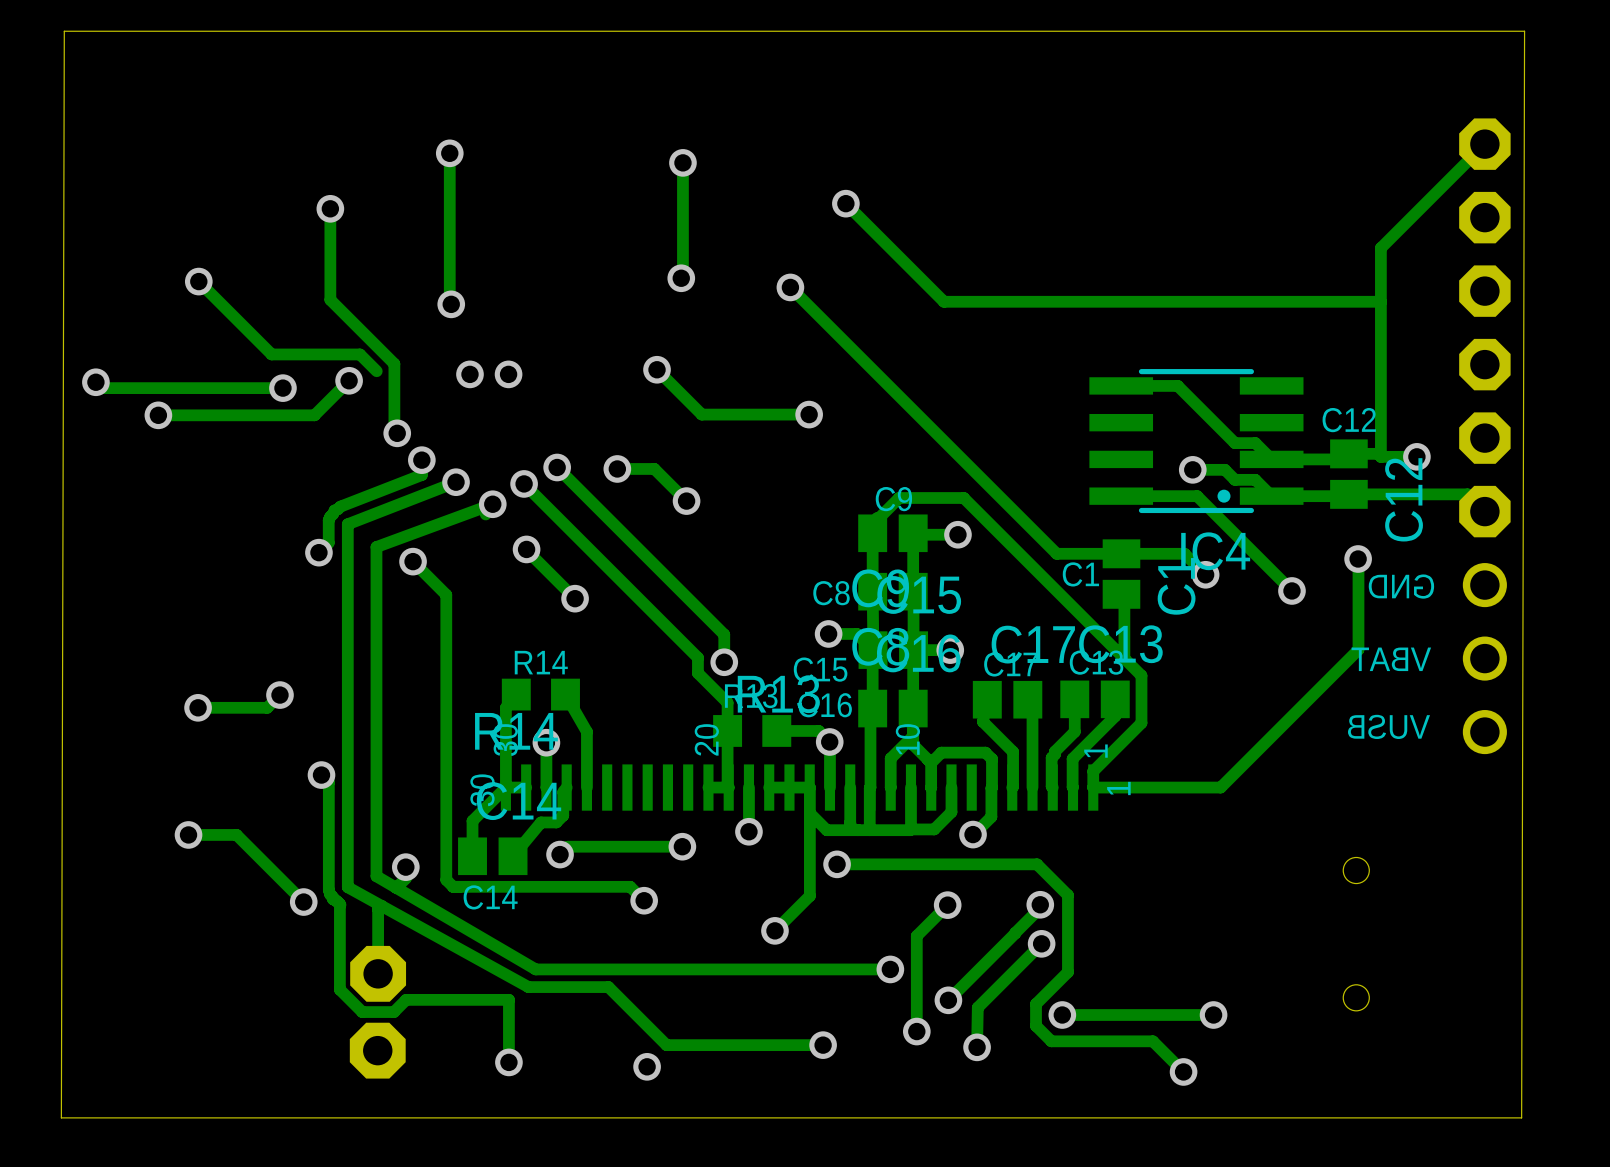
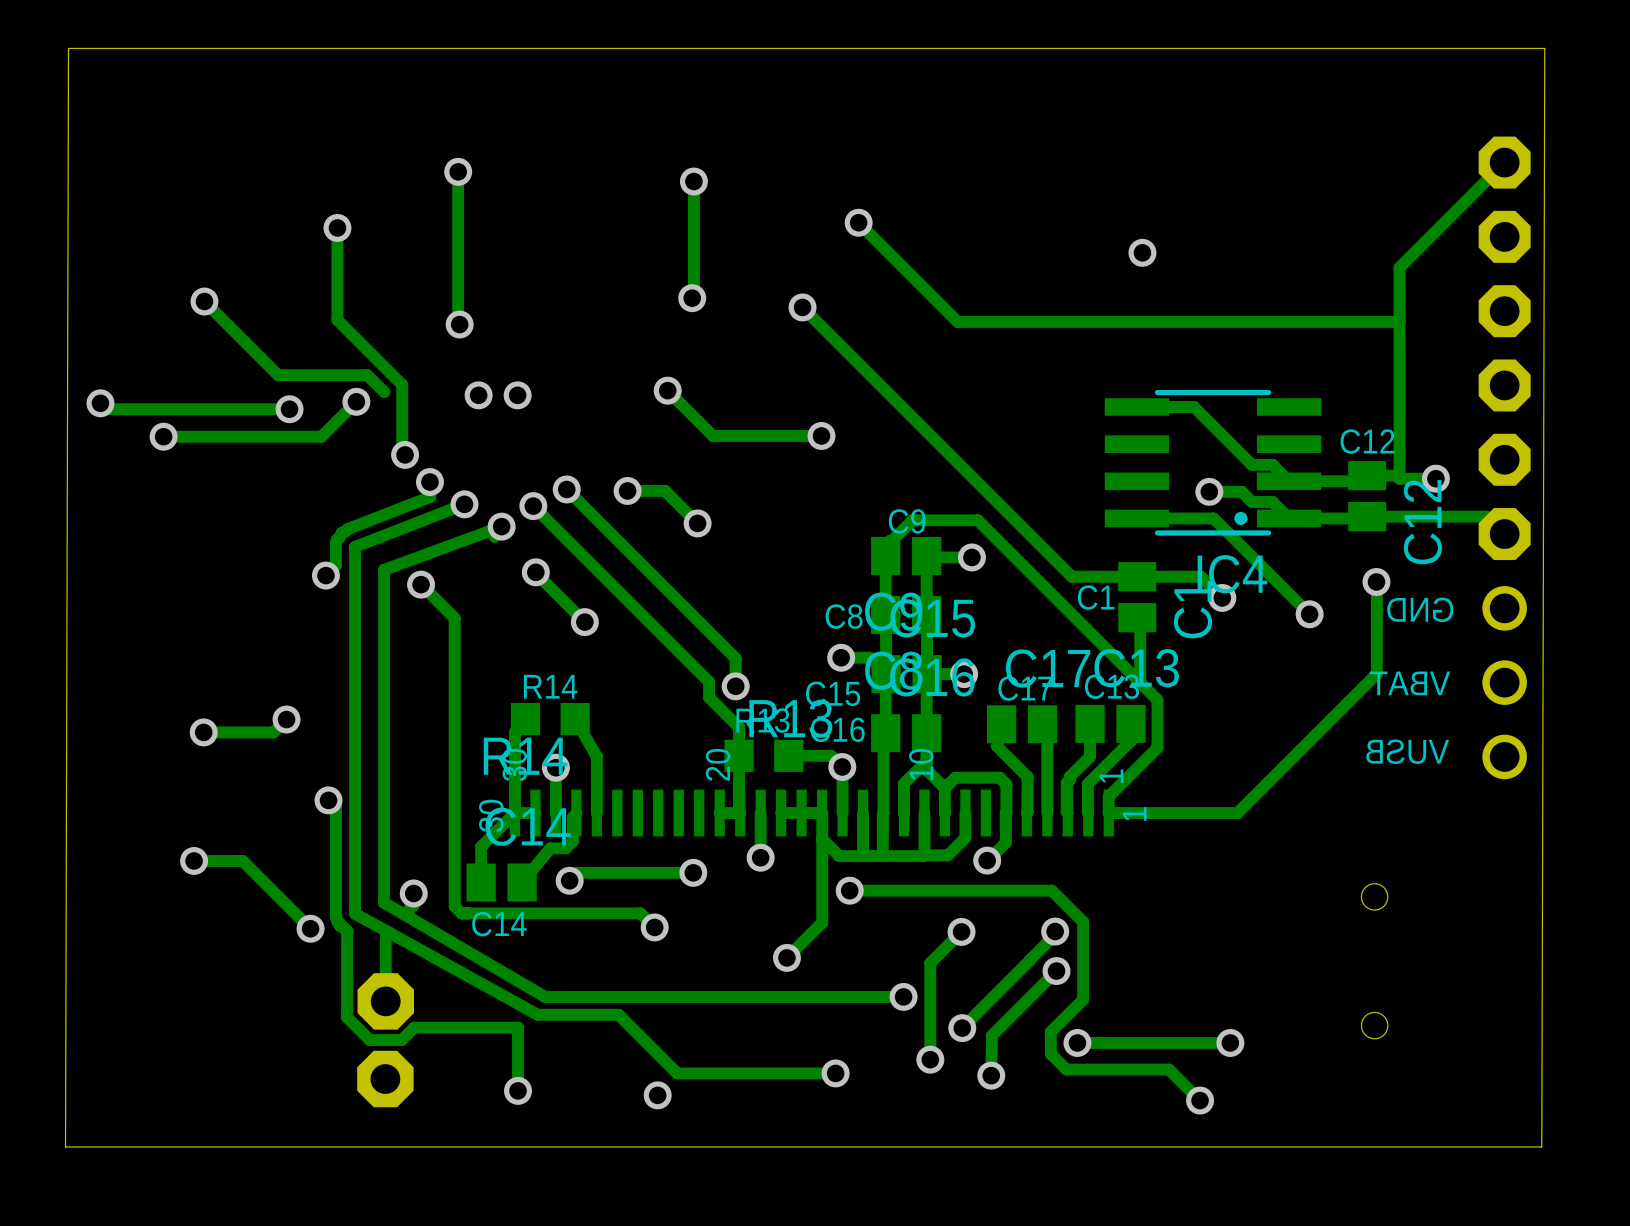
via: none -> (1142, 252)

